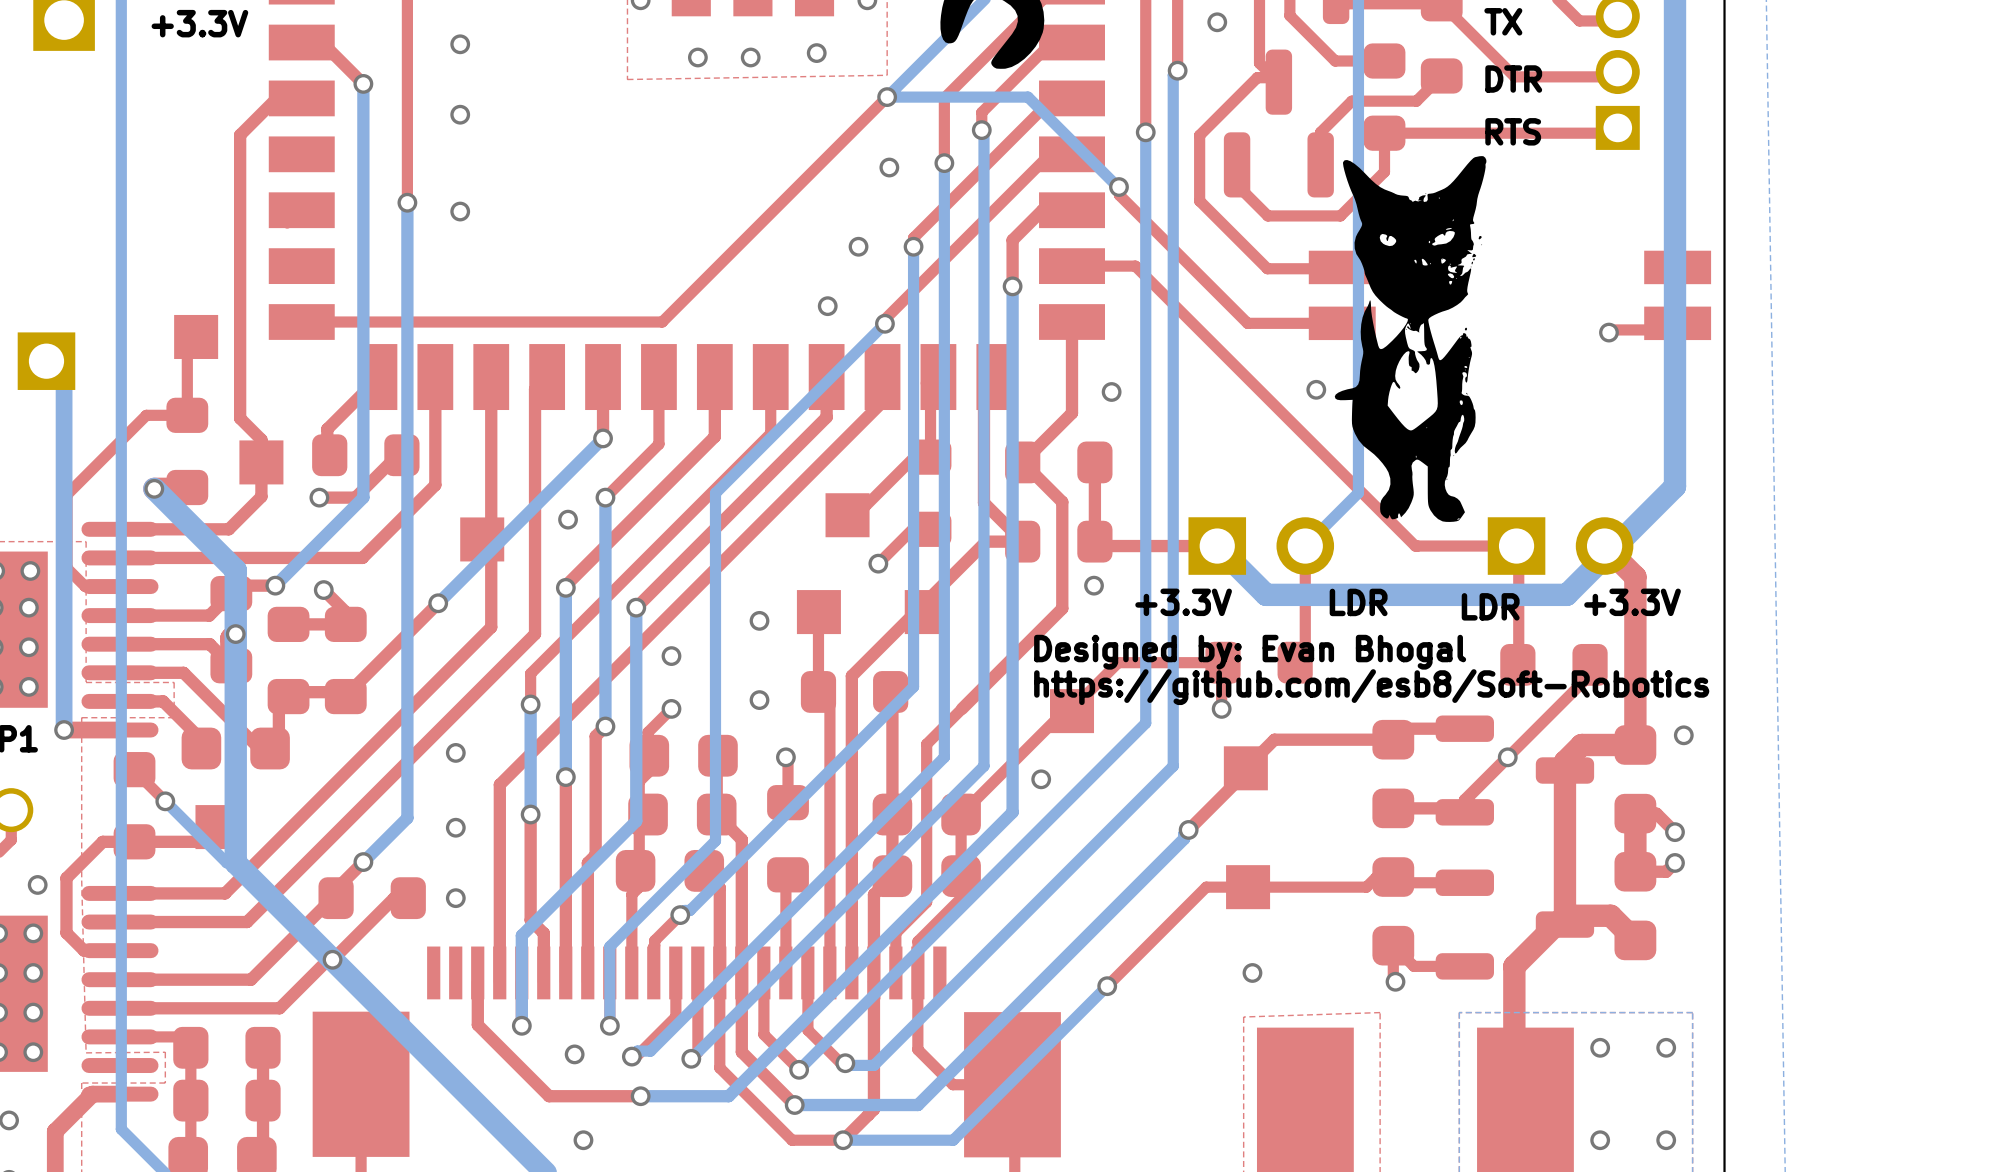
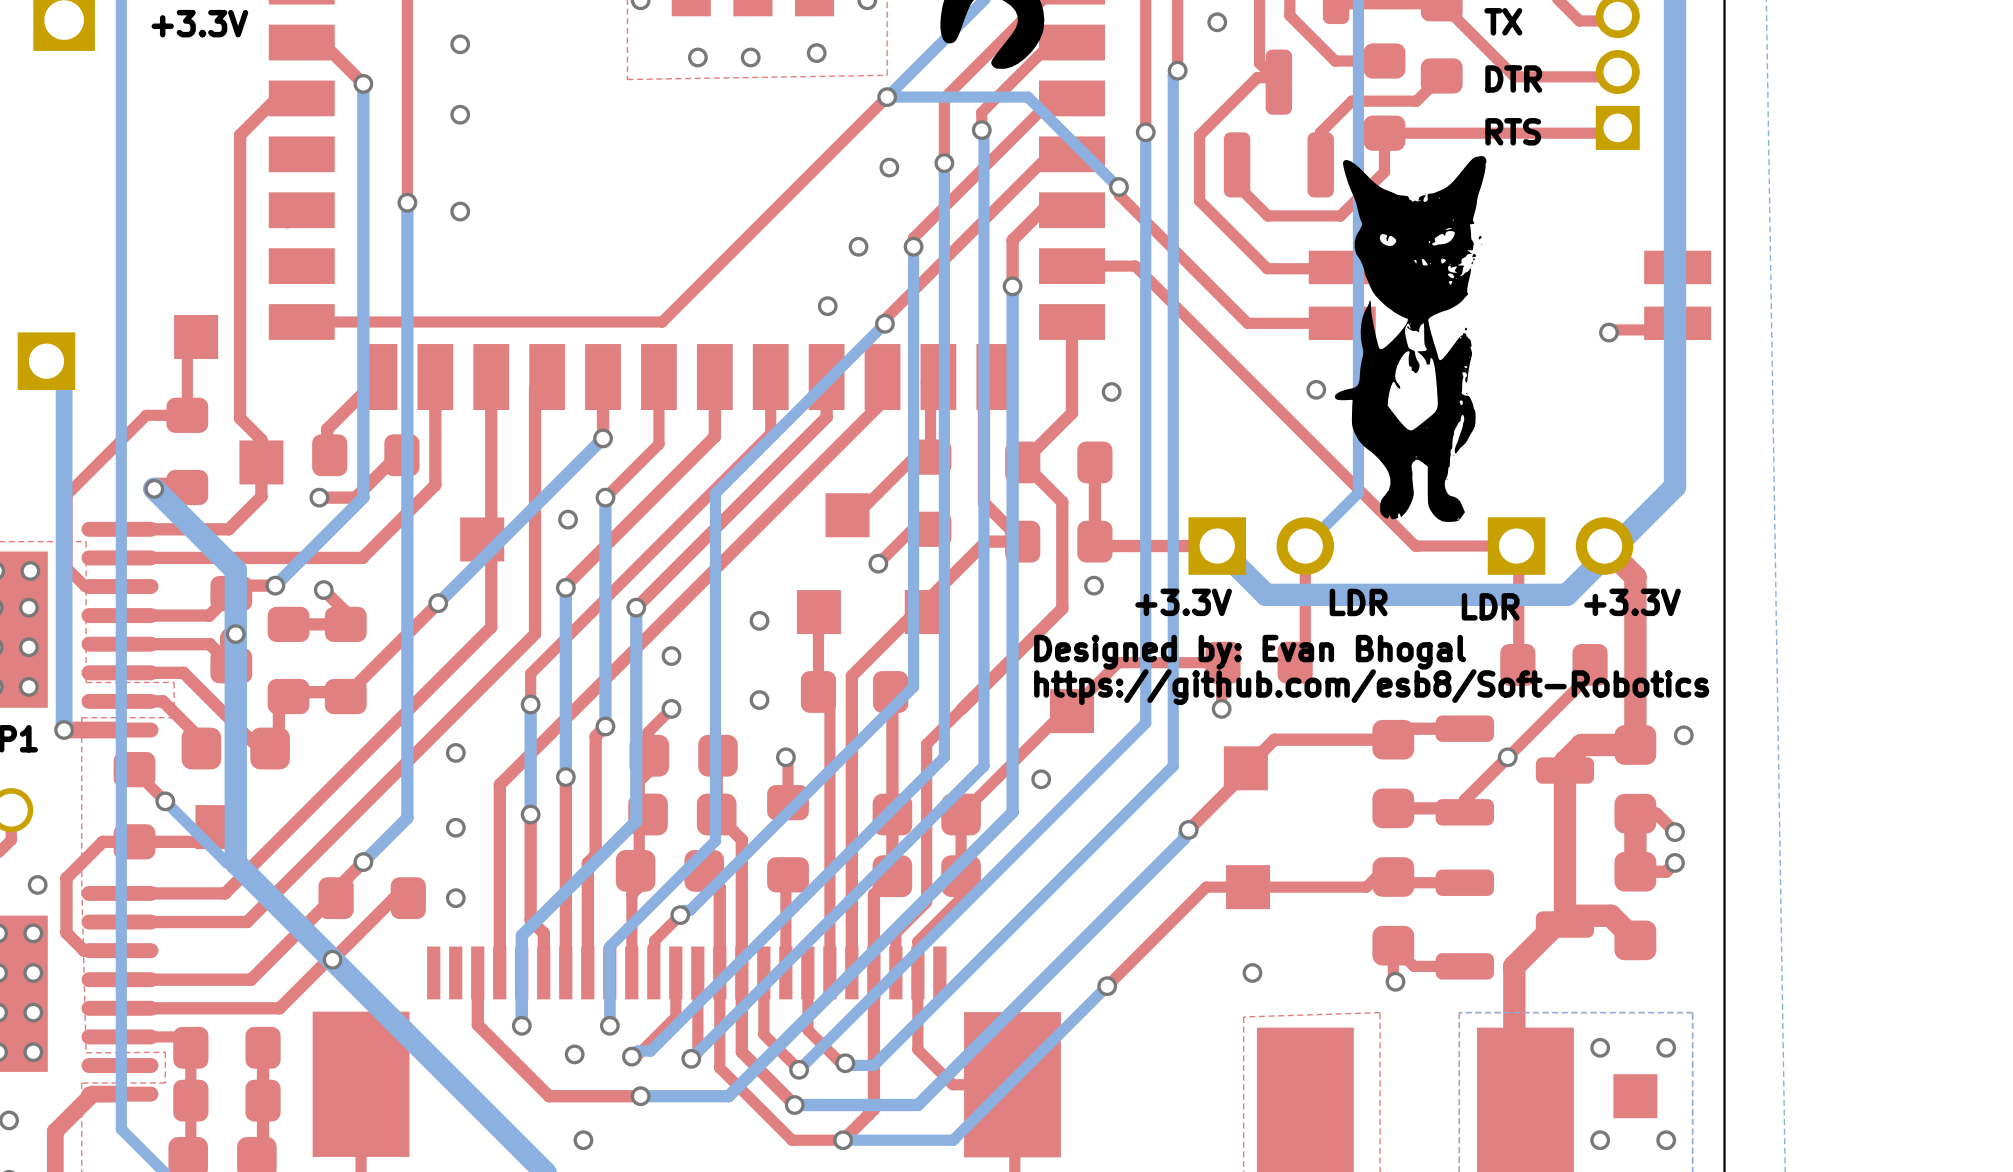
part: none -> (1635, 1096)

